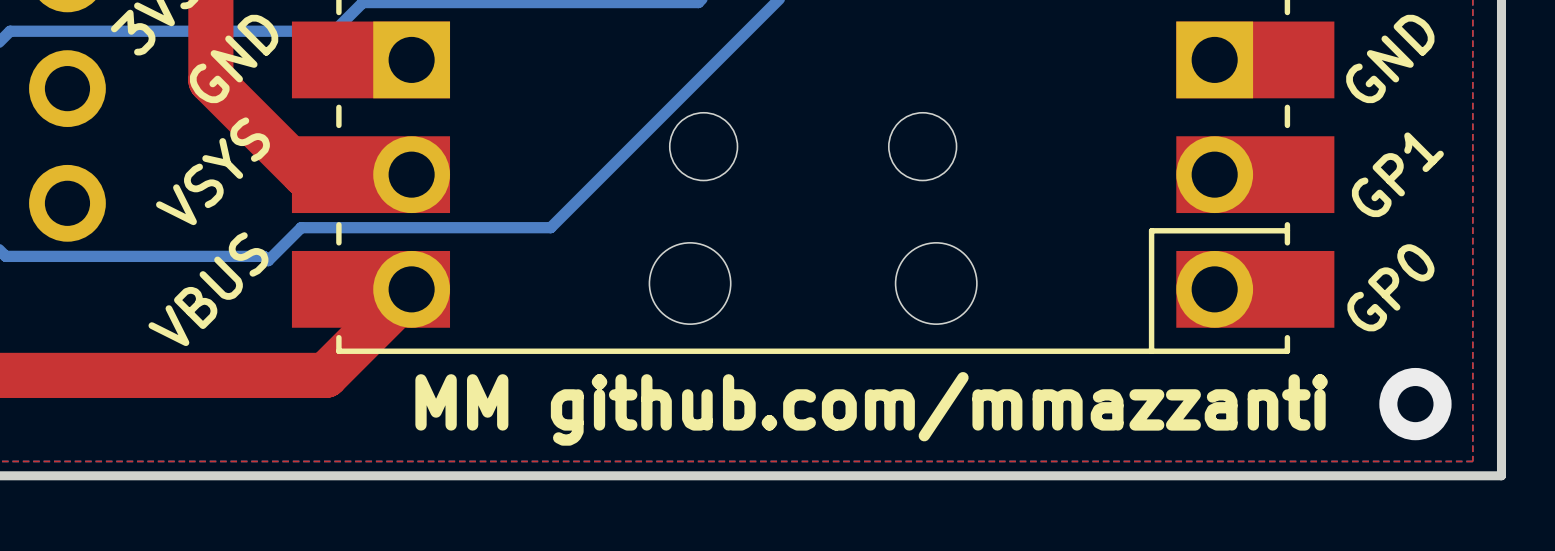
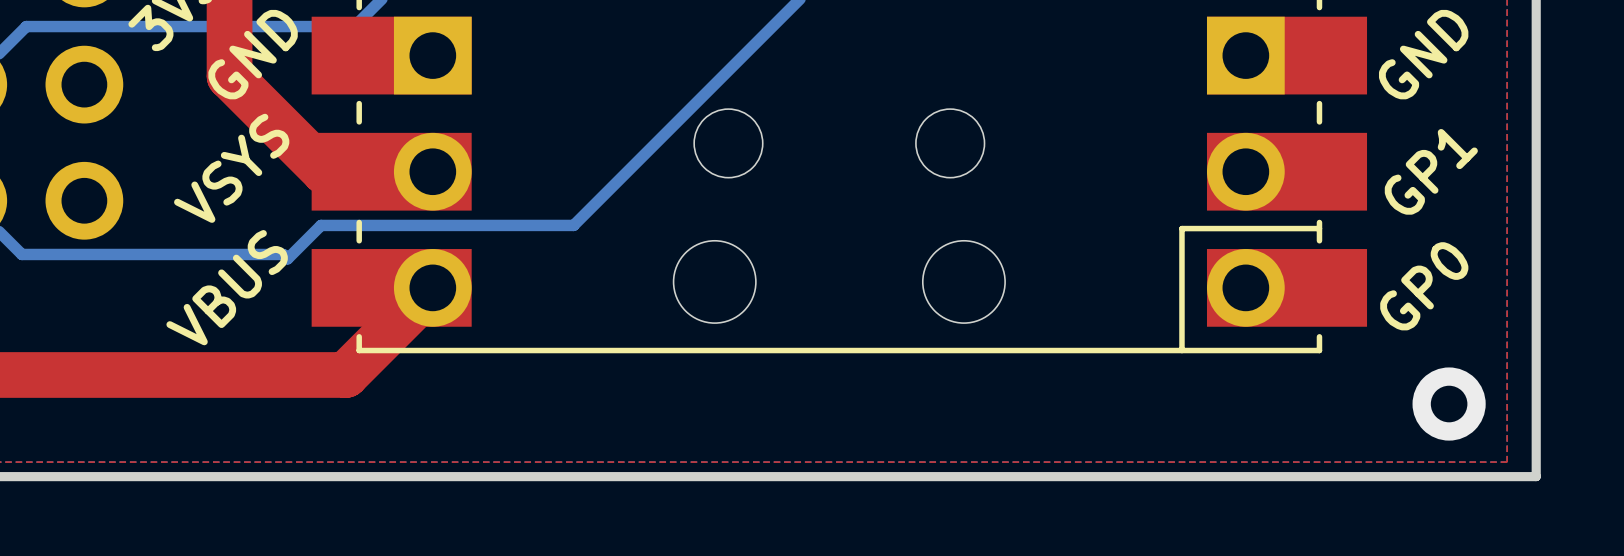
text: MM github.com/mmazzanti (871, 408) -> none

